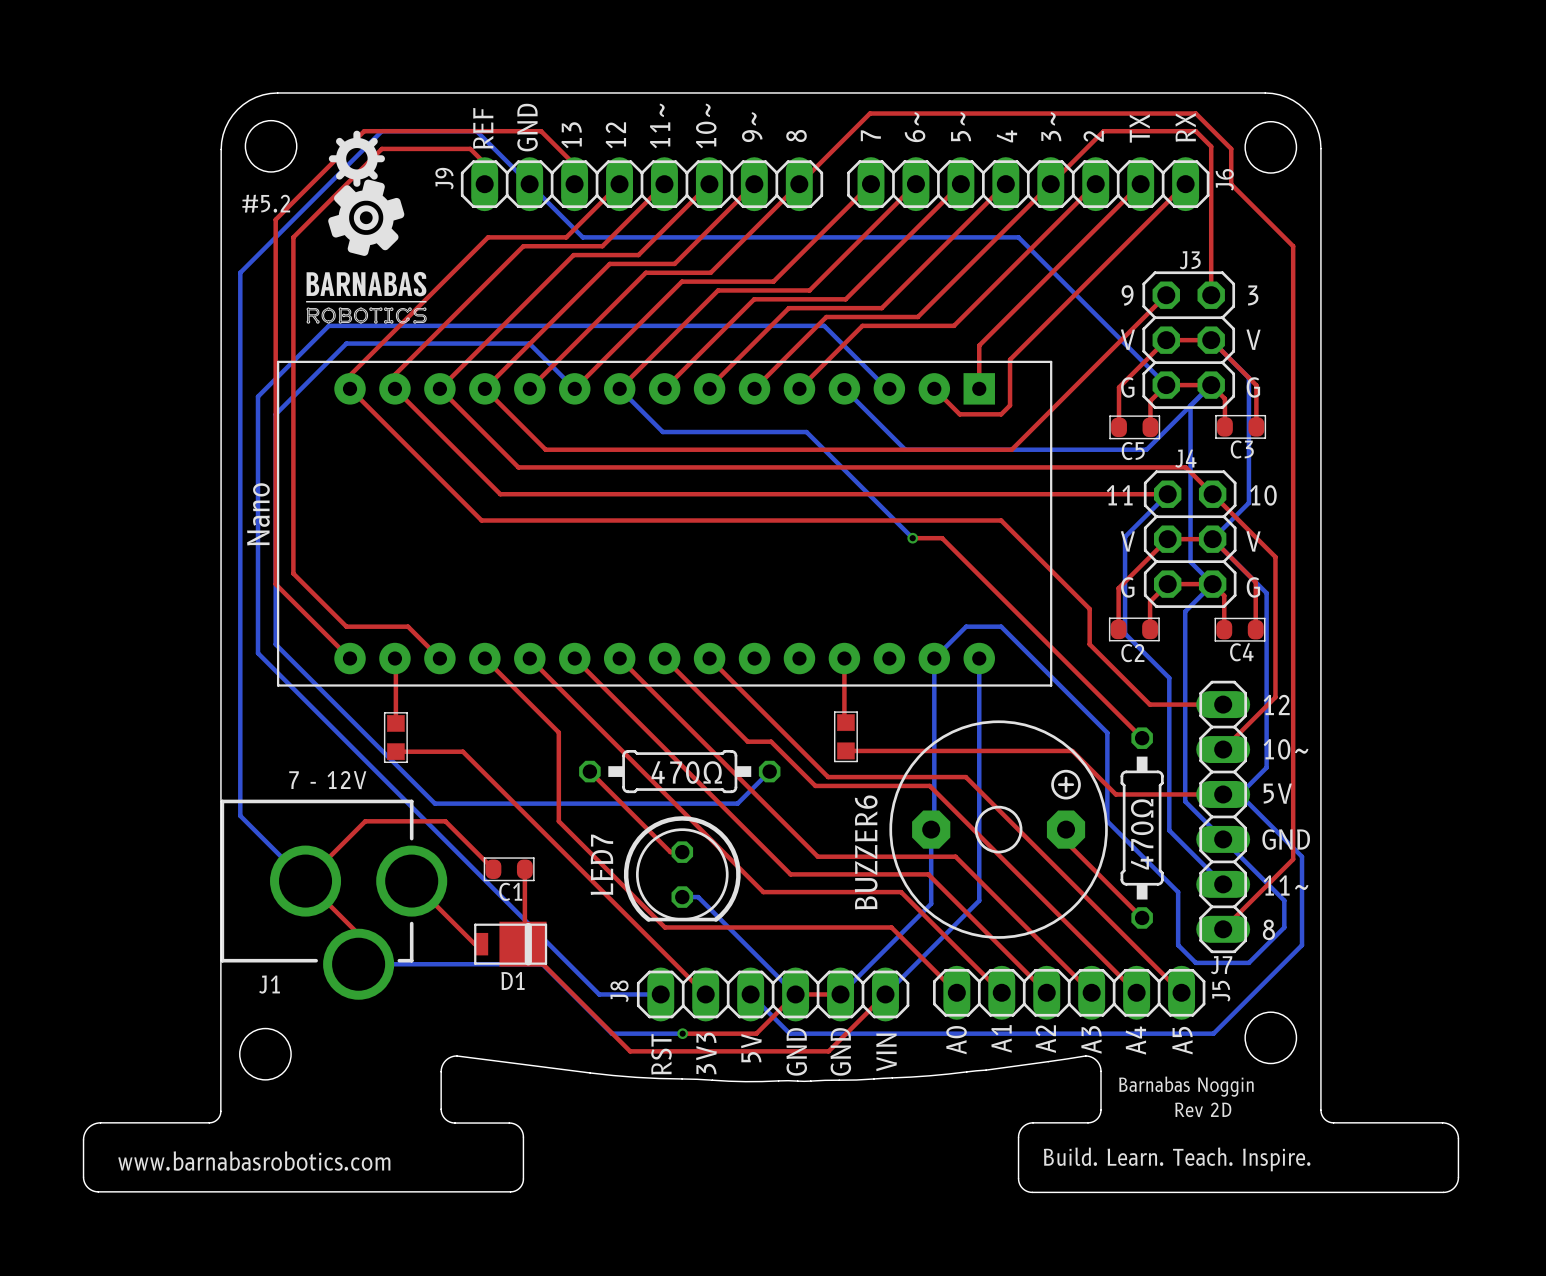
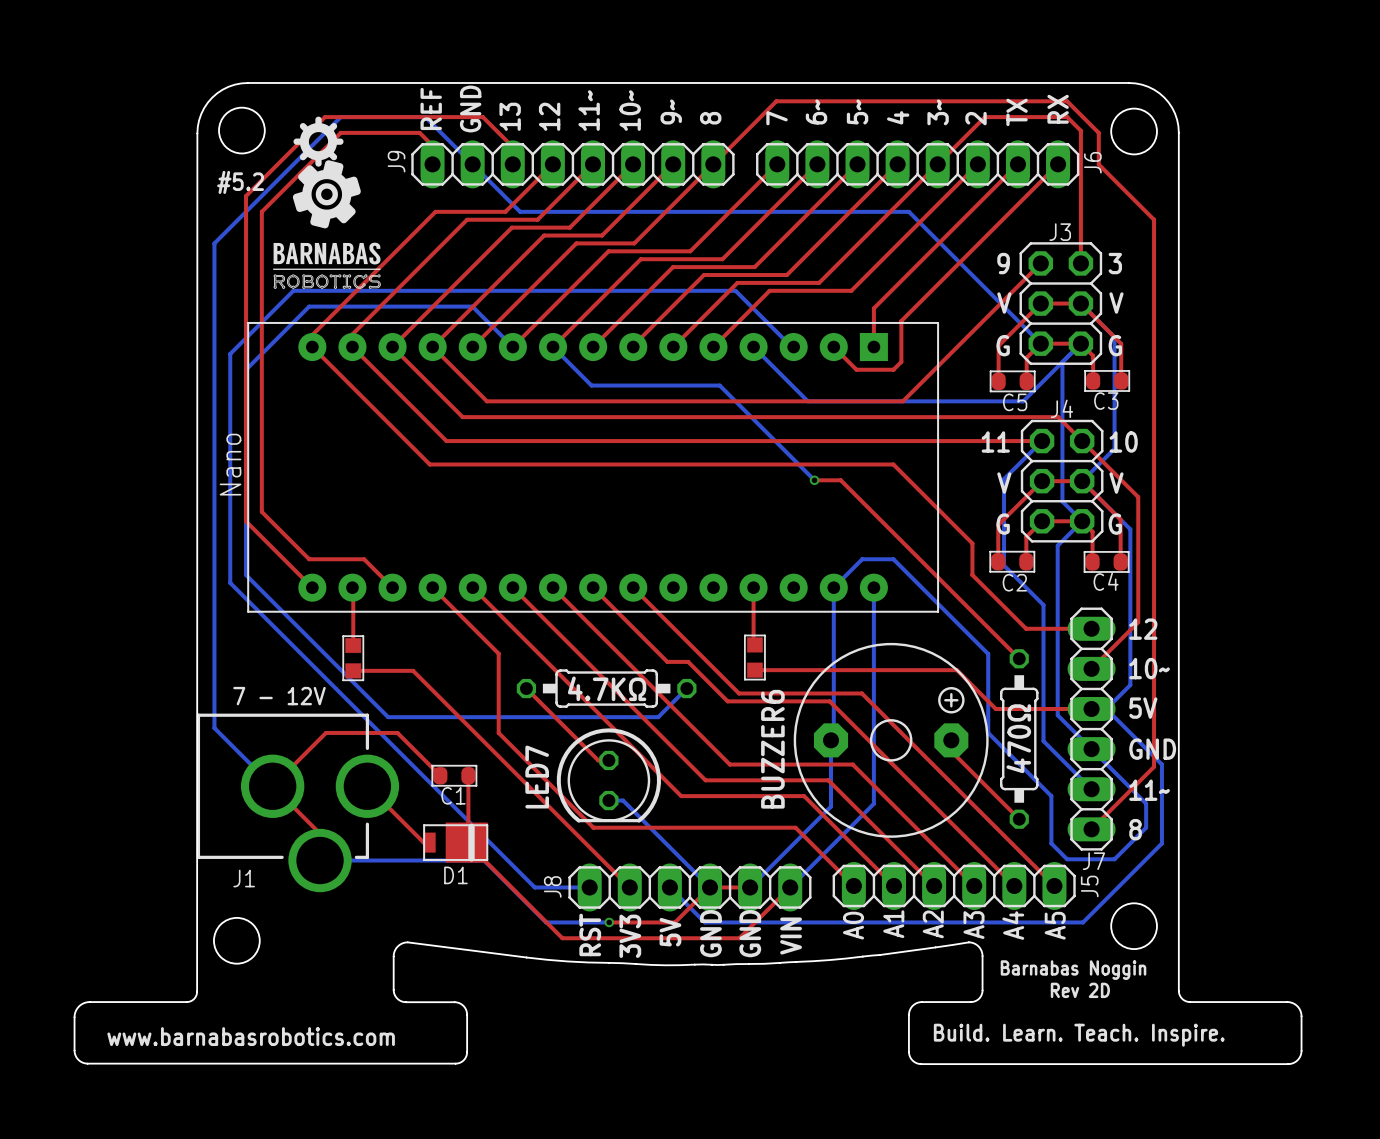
text: 470Ω (686, 772) -> 4.7KΩ (607, 688)

